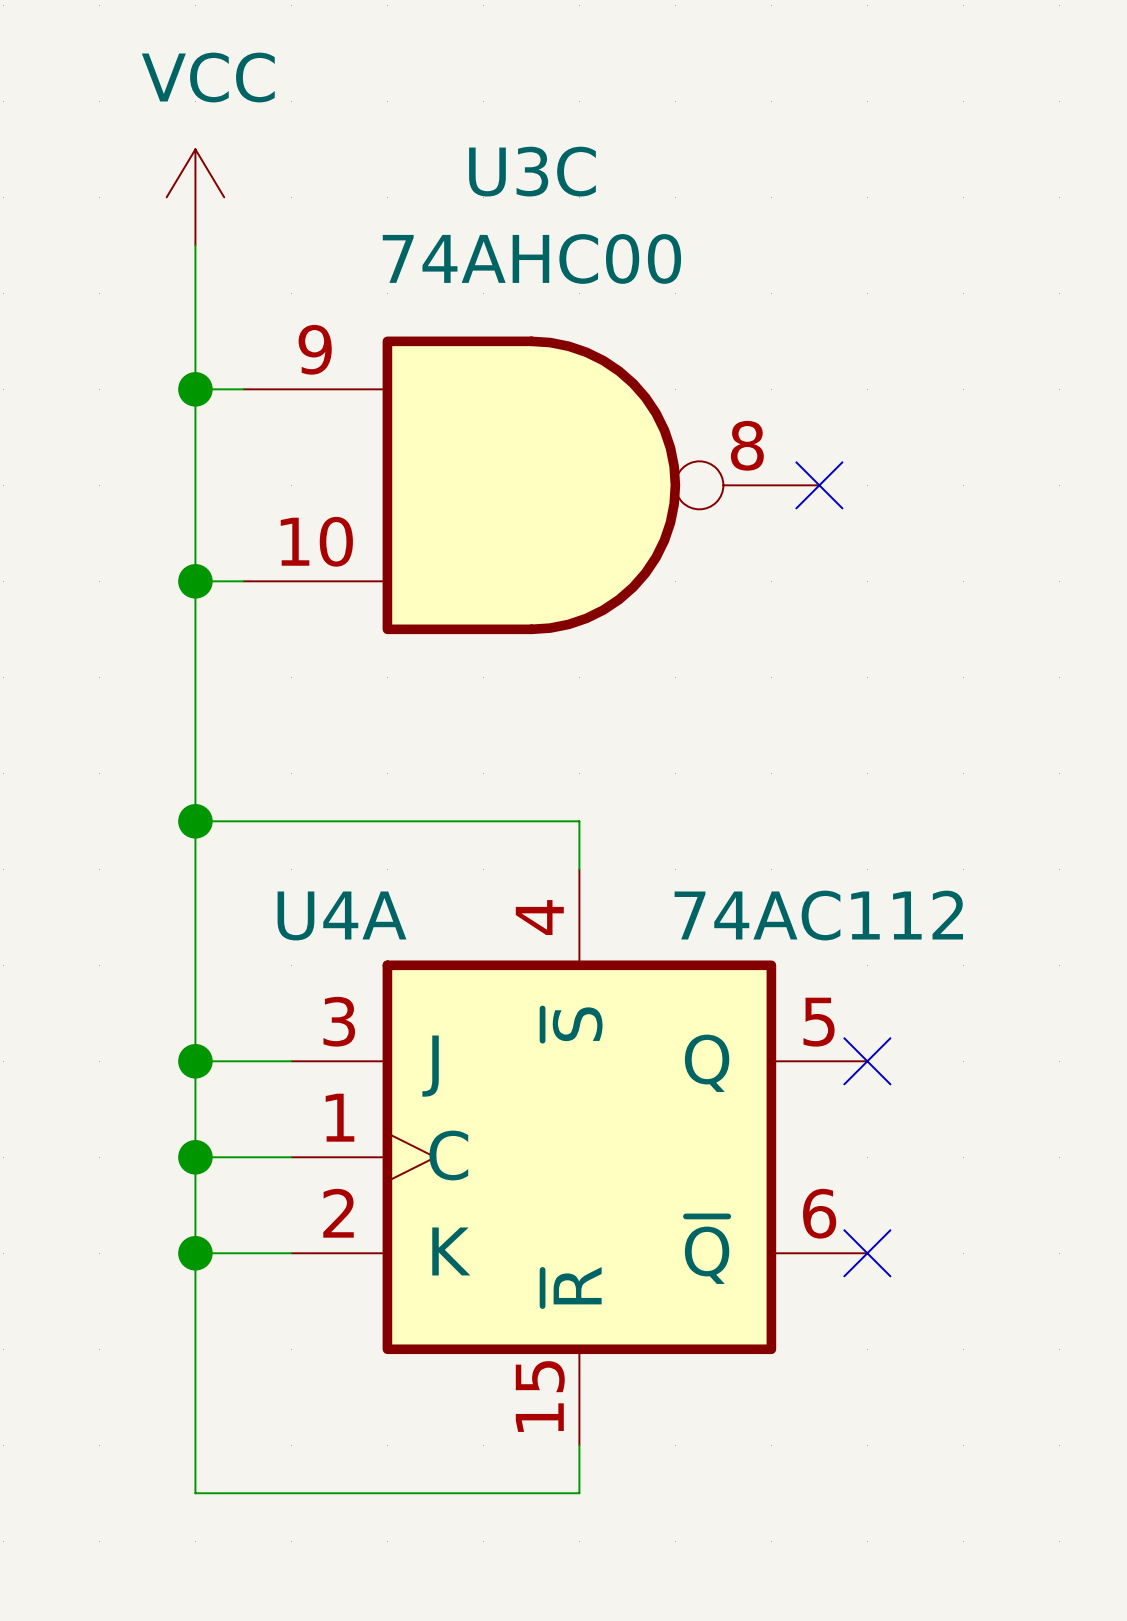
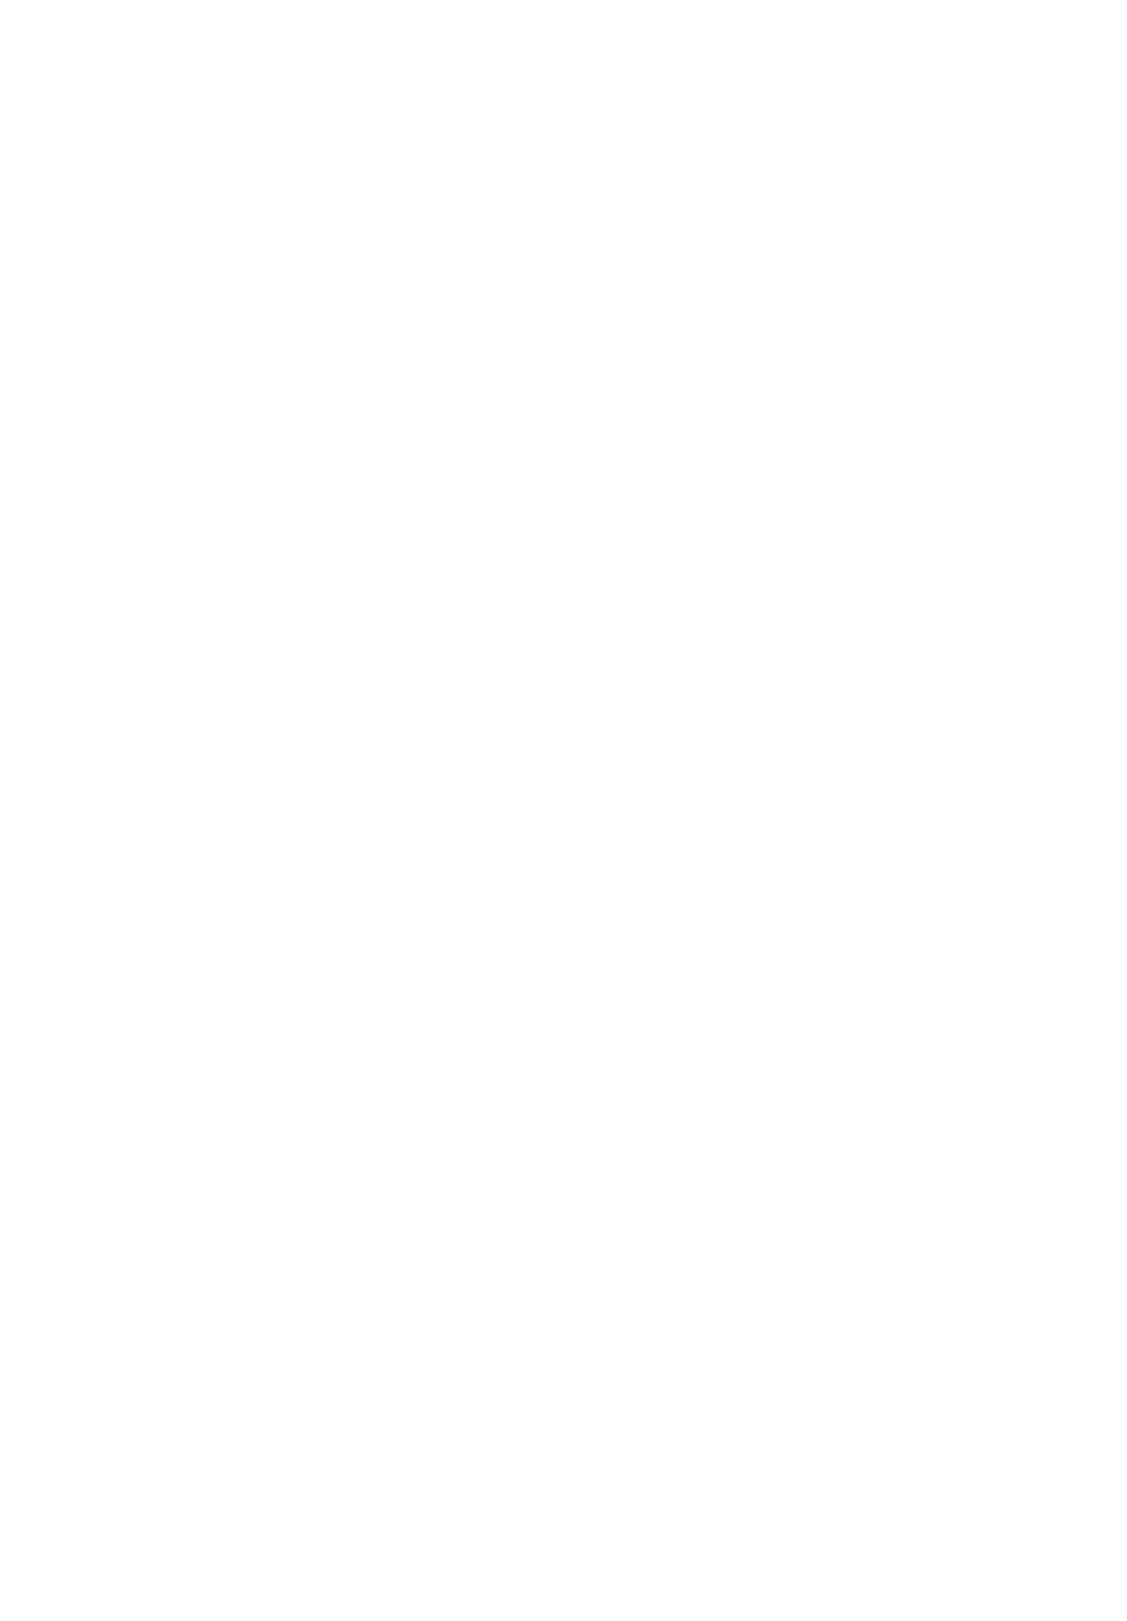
power symbol: VCC (195, 197) -> none
wire: (195, 245) (195, 1493) (579, 1493) (579, 1445) -> none
wire: (195, 389) (243, 389) -> none
junction: (195, 389) -> none
U3C: 74AHC00 (531, 485) -> none
no-connect mark: (819, 485) -> none
wire: (195, 581) (243, 581) -> none
junction: (195, 581) -> none
wire: (195, 821) (579, 821) (579, 869) -> none
junction: (195, 821) -> none
wire: (195, 1061) (291, 1061) -> none
junction: (195, 1061) -> none
no-connect mark: (867, 1061) -> none
wire: (195, 1157) (291, 1157) -> none
junction: (195, 1157) -> none
U4A: 74AC112 (579, 1157) -> none
wire: (195, 1253) (291, 1253) -> none
junction: (195, 1253) -> none
no-connect mark: (867, 1253) -> none

